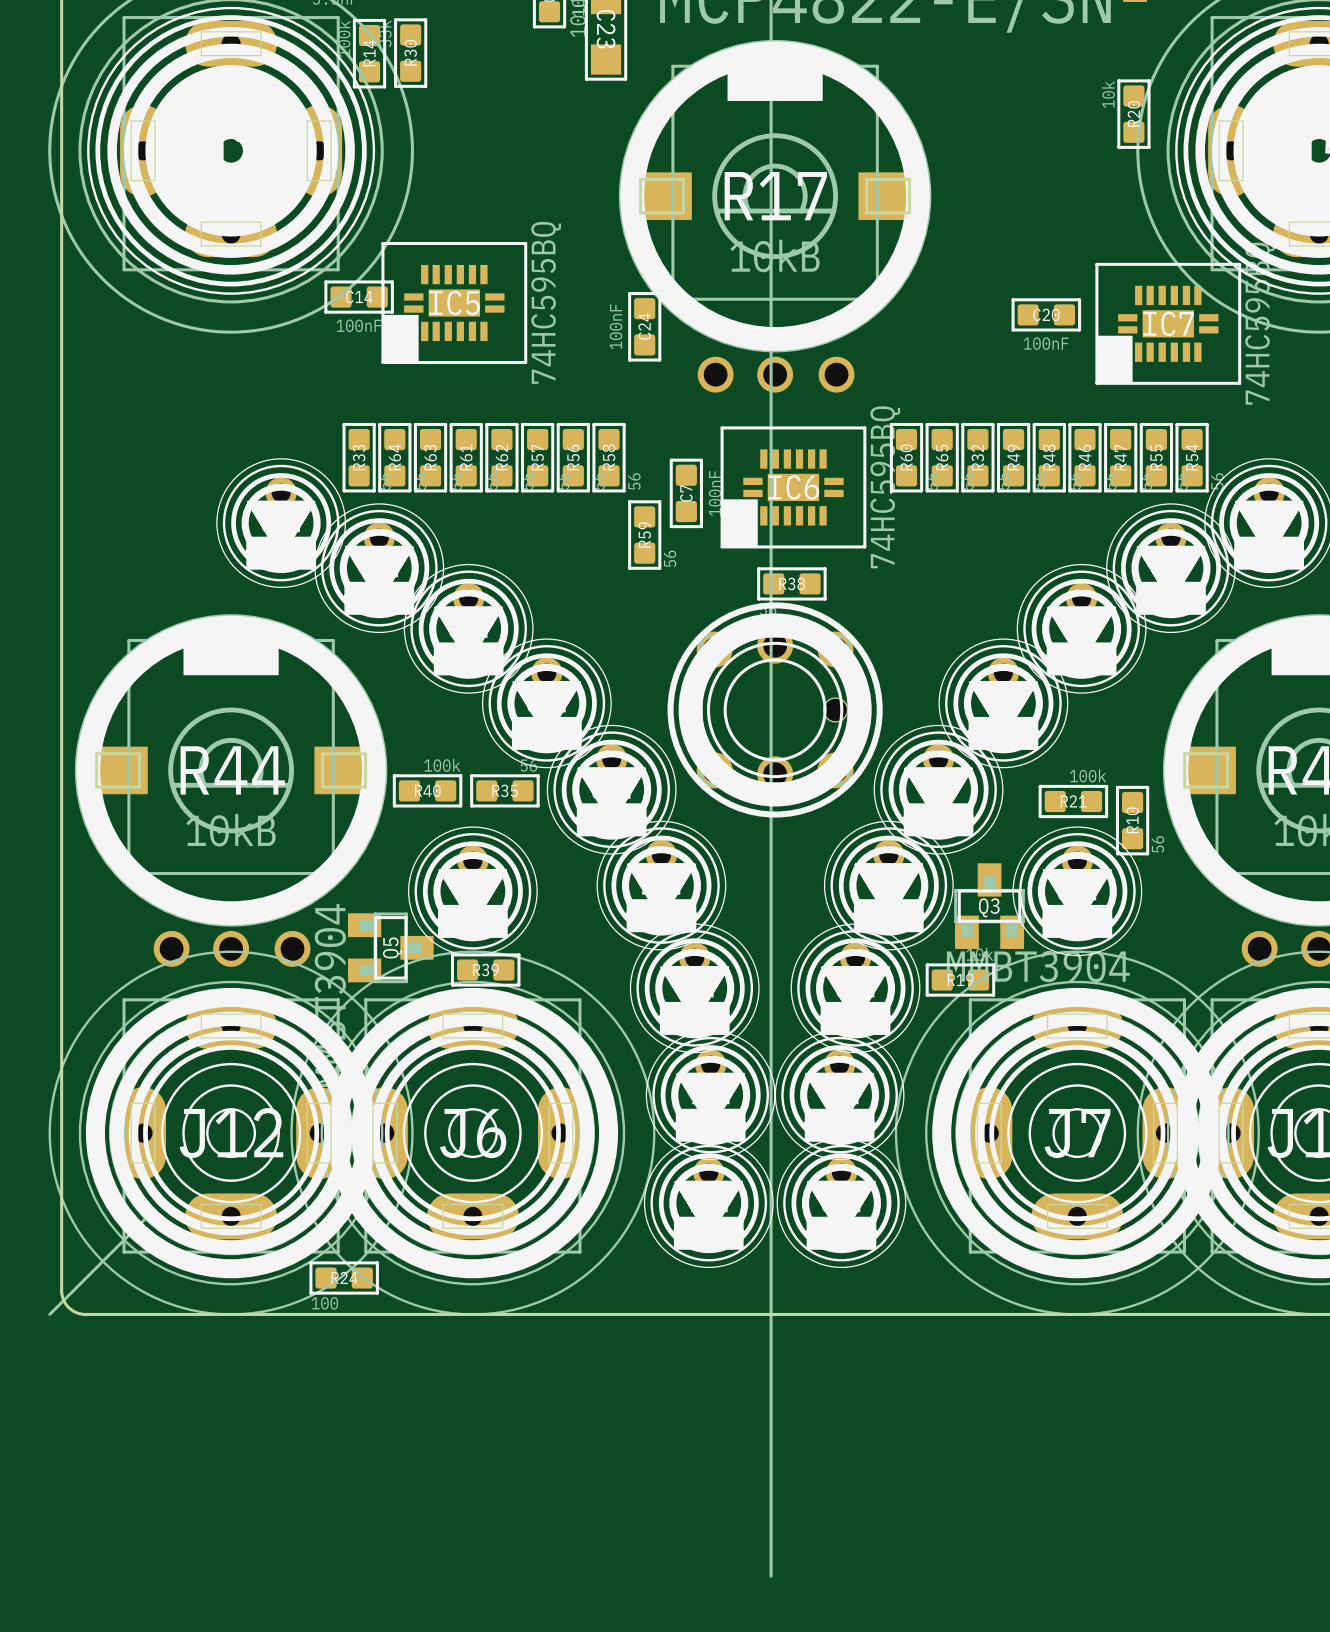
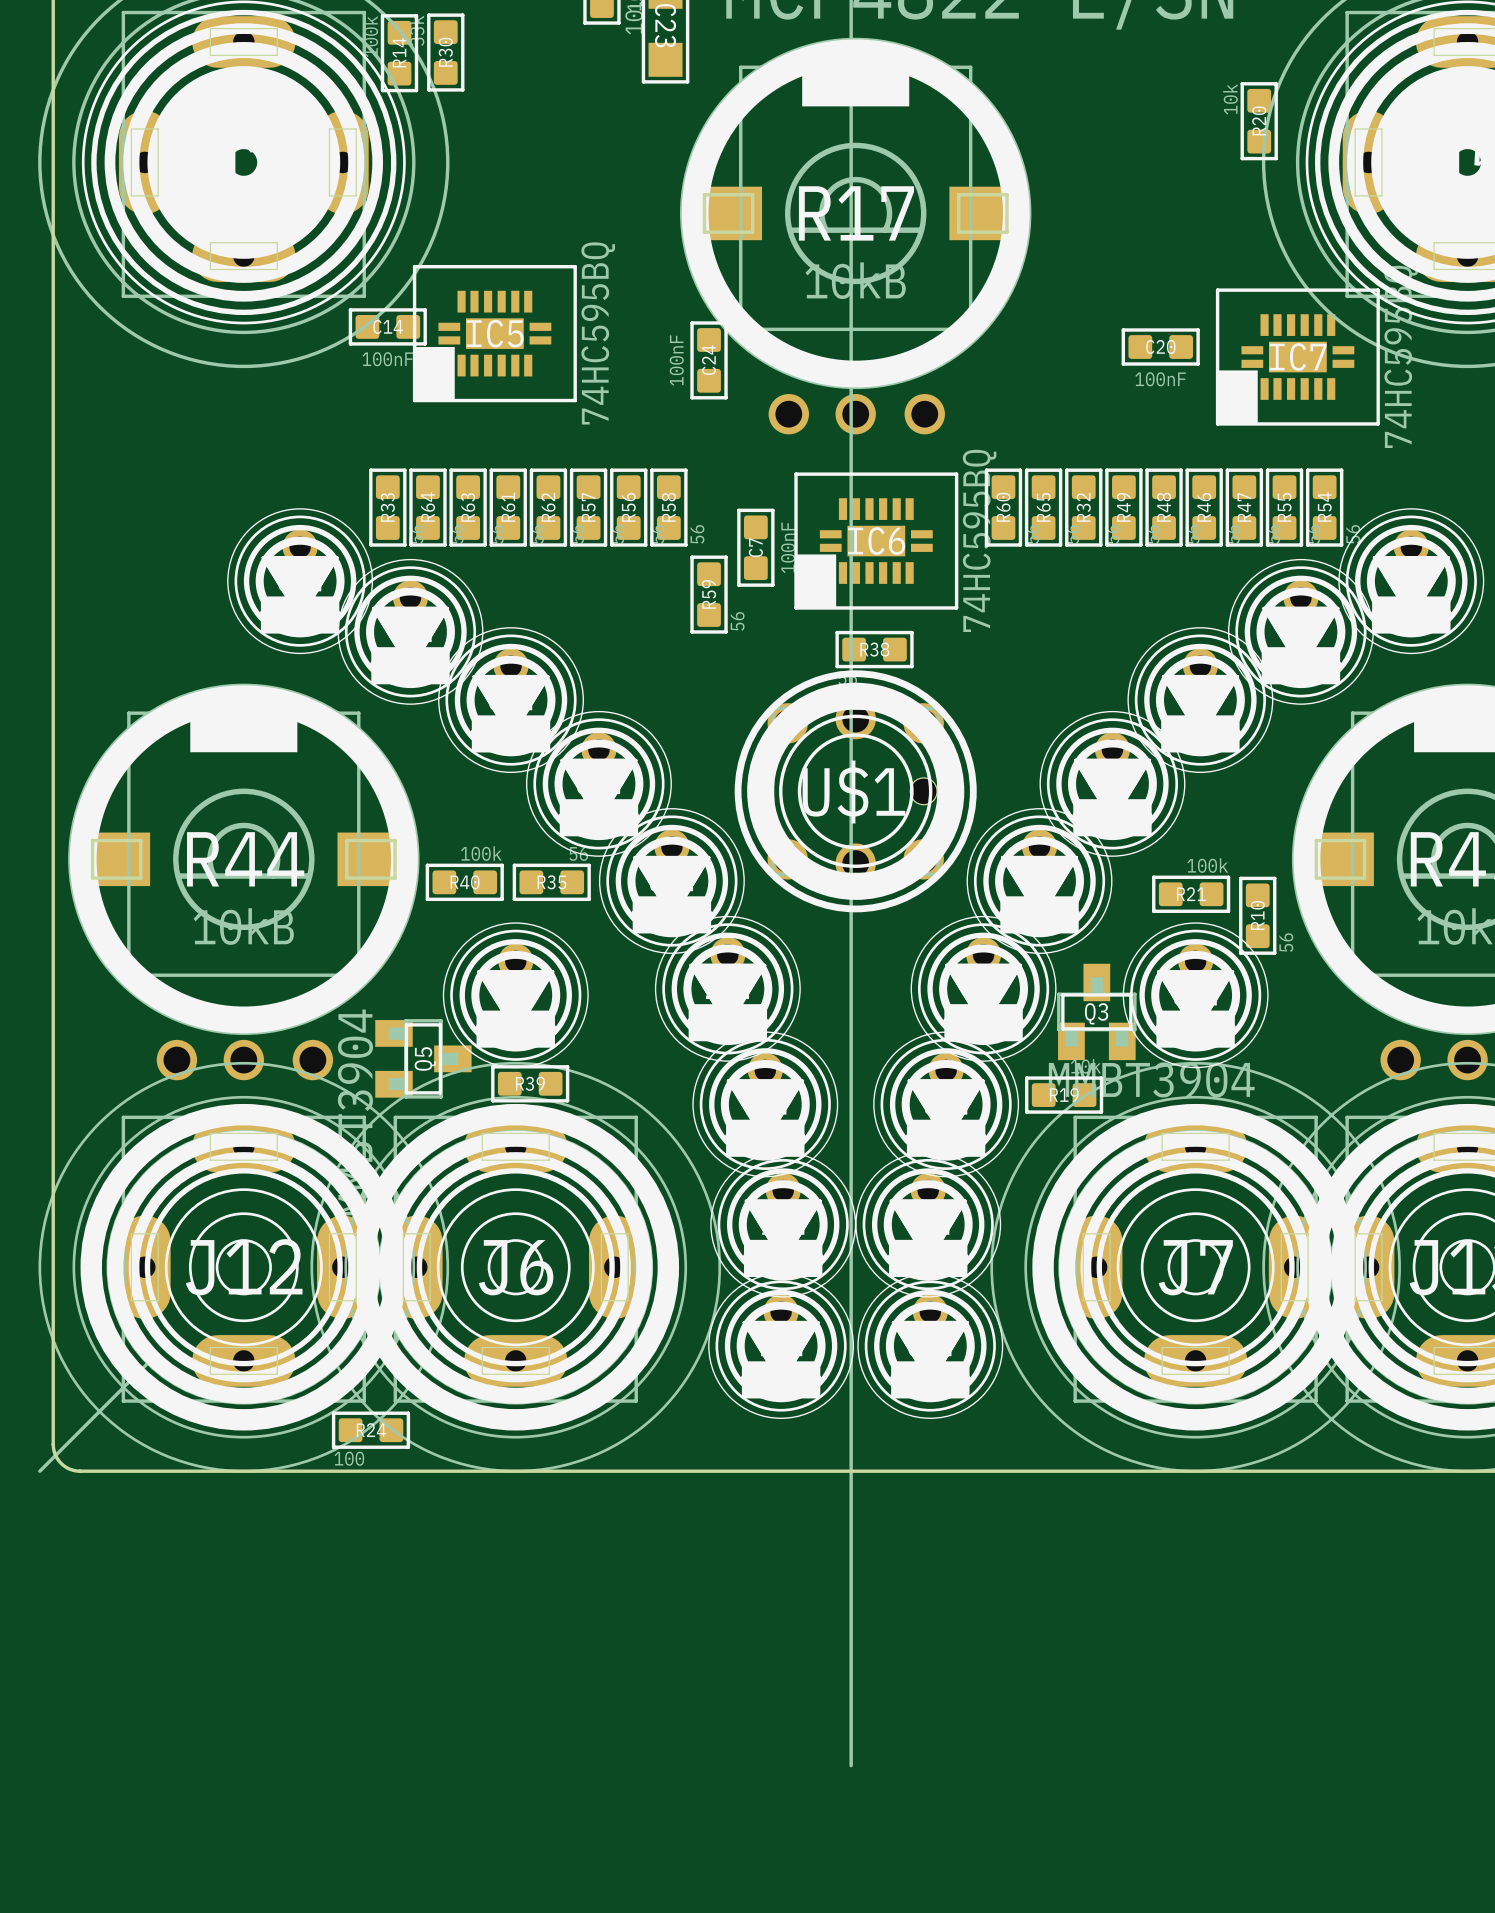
text: none -> U$1 (853, 791)

